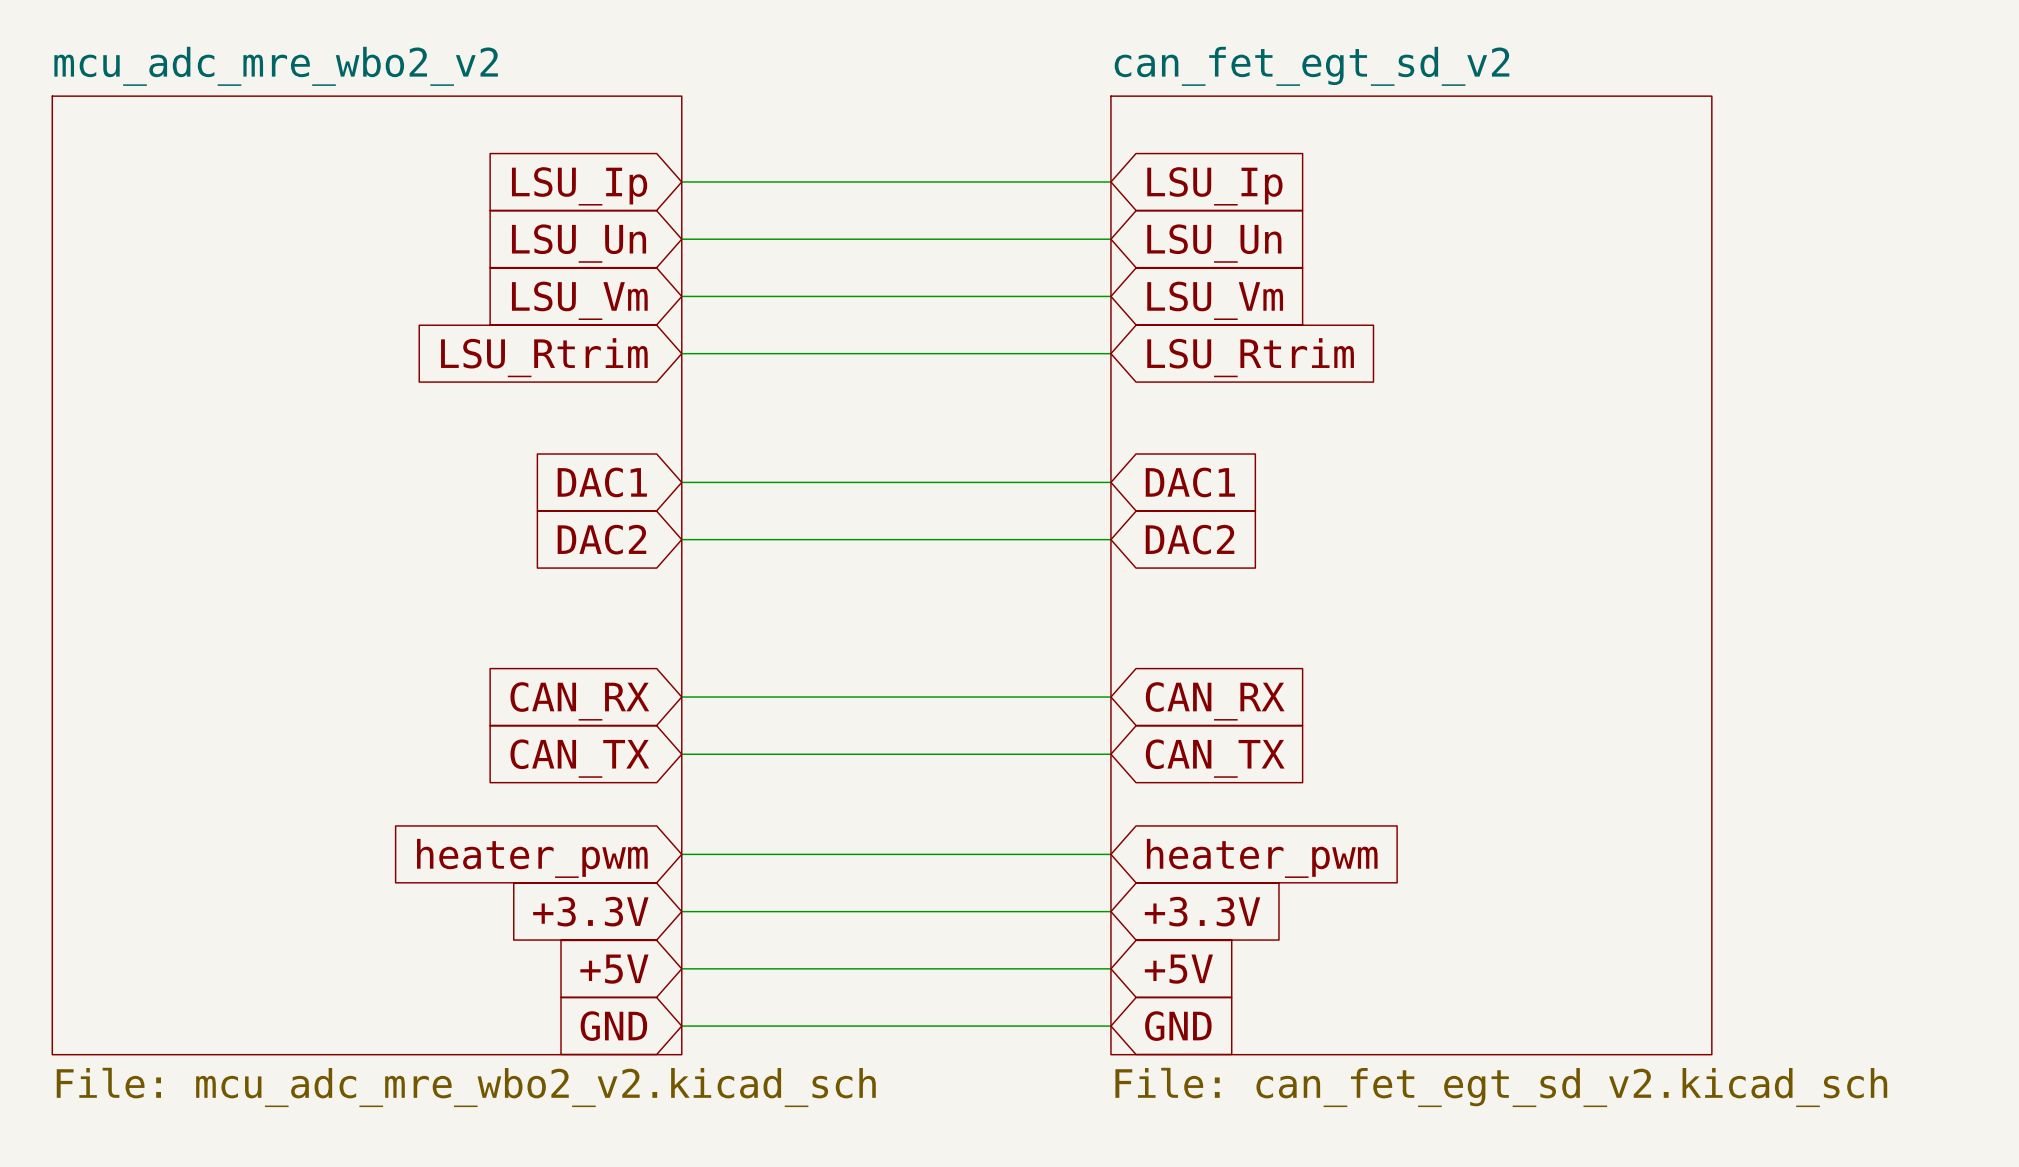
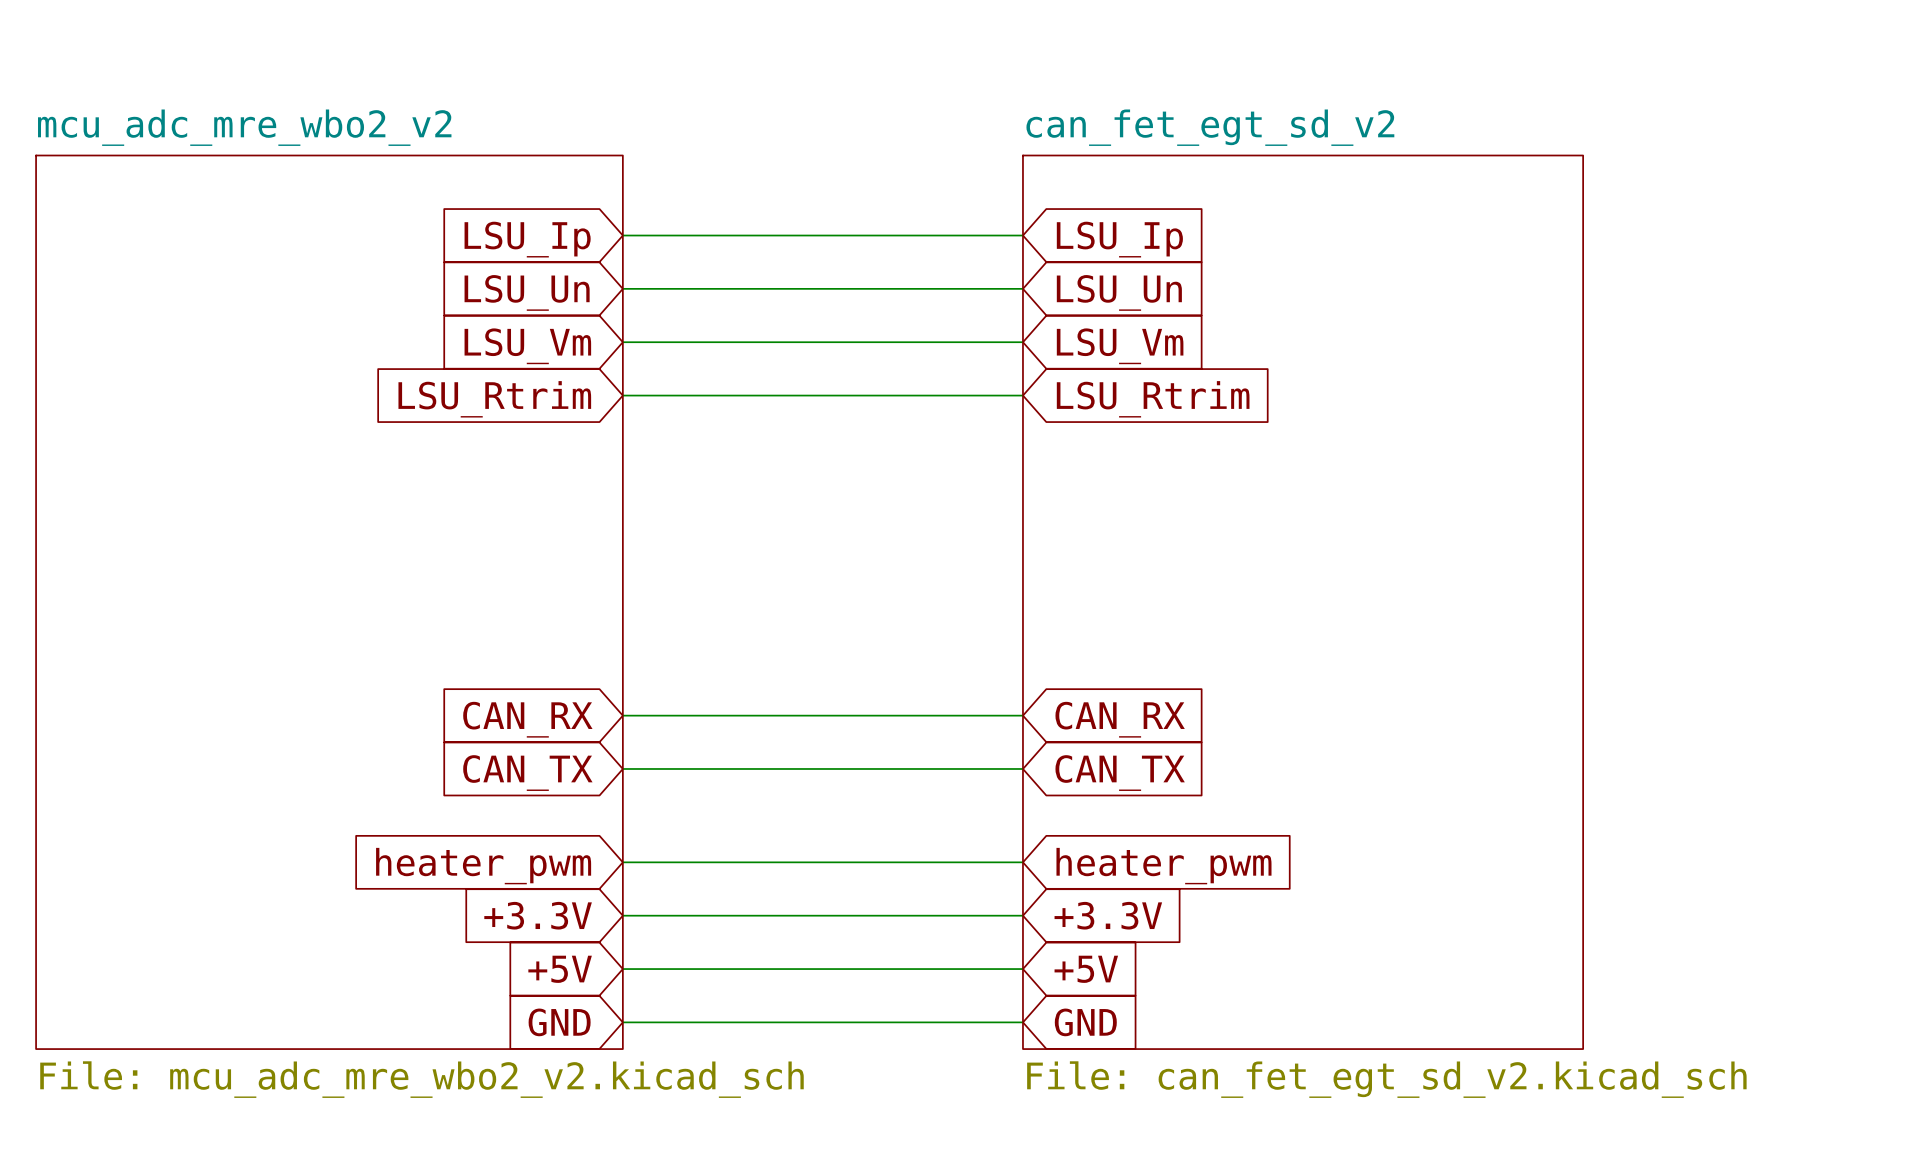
global label: DAC1 (602, 482) -> none
wire: (681, 482) (1110, 482) -> none
global label: DAC1 (1190, 482) -> none
global label: DAC2 (601, 539) -> none
wire: (681, 539) (1110, 539) -> none
global label: DAC2 (1190, 539) -> none

